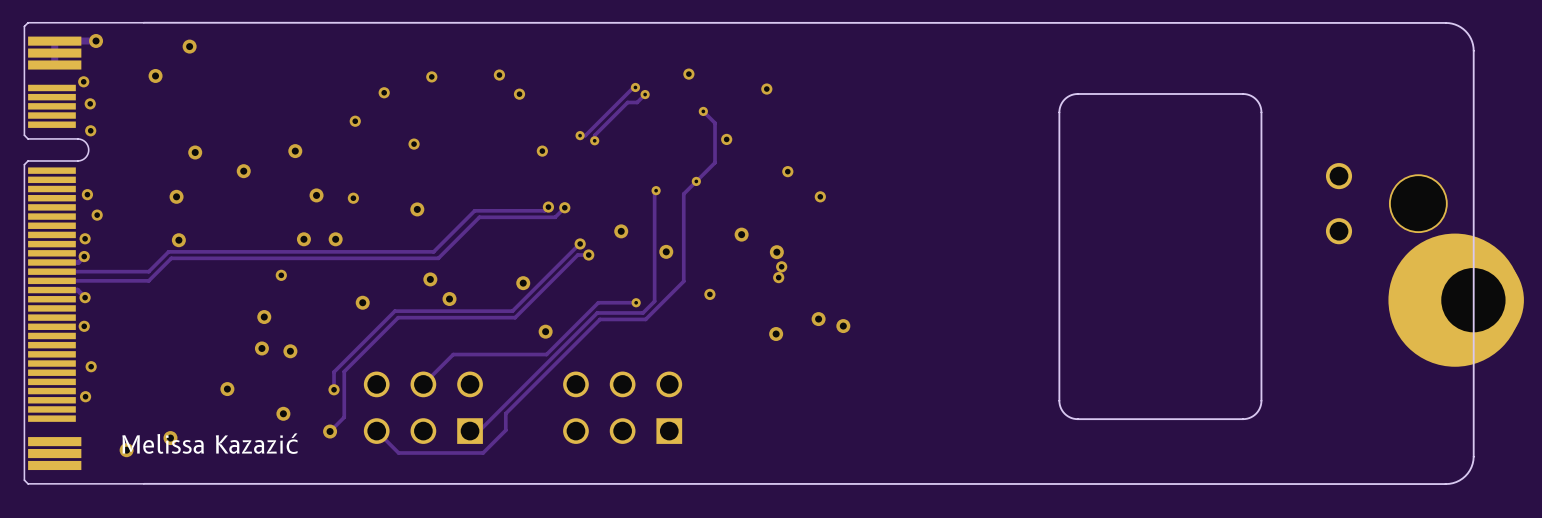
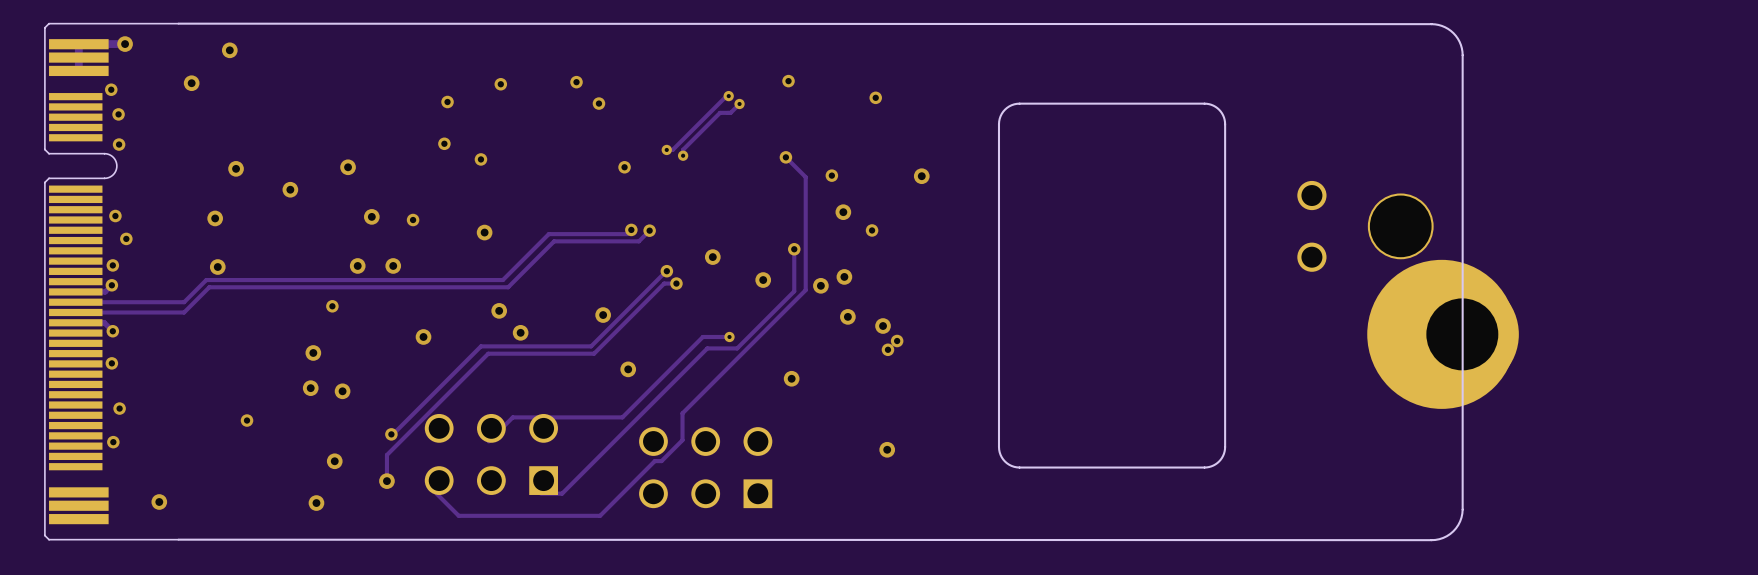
board edge: (143, 22) (1445, 22) (1455, 24) (1465, 31) (1472, 41) (1473, 50) (1473, 456) (1467, 473) (1452, 483) (143, 483) -> (178, 23) (1431, 24) (1441, 25) (1453, 33) (1460, 44) (1462, 55) (1462, 509) (1460, 521) (1456, 528) (1443, 537) (1431, 540) (178, 539)
board edge: none -> (1204, 103) (1019, 103) (1009, 106) (1001, 113) (998, 124) (998, 446) (1001, 457) (1009, 464) (1019, 467) (1204, 467) (1215, 464) (1223, 455) (1225, 446) (1225, 124) (1223, 115) (1219, 109) (1213, 105) (1204, 103)
board edge: (1243, 94) (1075, 94) (1067, 96) (1061, 104) (1059, 112) (1059, 400) (1062, 410) (1069, 417) (1077, 419) (1243, 419) (1252, 416) (1259, 408) (1261, 400) (1261, 112) (1256, 99) (1243, 94) -> none
track: (703, 111) (715, 123) (715, 162) (683, 194) (683, 281) -> (788, 157) (785, 157) (805, 177) (805, 290) (782, 313)
via: (703, 111) -> none
via position: (355, 121) -> (444, 143)
via position: (726, 139) -> (831, 175)
via: none -> (785, 157)
via: none -> (921, 176)
via: (787, 171) -> none
via: (696, 181) -> none
track: (656, 190) (654, 301) -> (794, 249) (794, 291) (750, 335)
via: (656, 190) -> none
via: none -> (843, 212)
via: (820, 196) -> none
part position: (1386, 203) -> (1365, 226)
via: none -> (872, 230)
via: none -> (794, 249)
via position: (741, 234) -> (844, 276)
via: (776, 252) -> none
via: none -> (820, 285)
via: (781, 266) -> none
via: (778, 277) -> none
via: none -> (847, 316)
via: none -> (883, 326)
via: (709, 294) -> none
part position: (1456, 300) -> (1443, 334)
track: (612, 302) (598, 302) (546, 354) (453, 354) (421, 386) -> (702, 336) (622, 417) (512, 417) (488, 441)
via: none -> (897, 341)
track: (414, 311) (394, 311) (334, 372) (334, 389) -> (480, 346) (391, 434)
track: (616, 312) (597, 312) (476, 433) (467, 433) -> (707, 348) (562, 493) (541, 493)
via: none -> (887, 349)
track: (420, 317) (398, 317) (344, 371) (344, 417) (330, 431) -> (488, 353) (386, 455) (386, 481)
track: (645, 319) (599, 319) (505, 413) (505, 430) (483, 452) (398, 452) (376, 431) -> (740, 355) (682, 413) (682, 440) (661, 461) (654, 461) (600, 515) (458, 515) (436, 493)
via: (818, 319) -> none
via: (843, 326) -> none
via: (776, 334) -> none
via: none -> (791, 378)
via: none -> (247, 420)
via: (227, 389) -> none
via: none -> (887, 449)
part position: (622, 407) -> (705, 467)
via: (170, 438) -> none
text: Melissa Kazazić (209, 443) -> none
via: none -> (316, 503)

